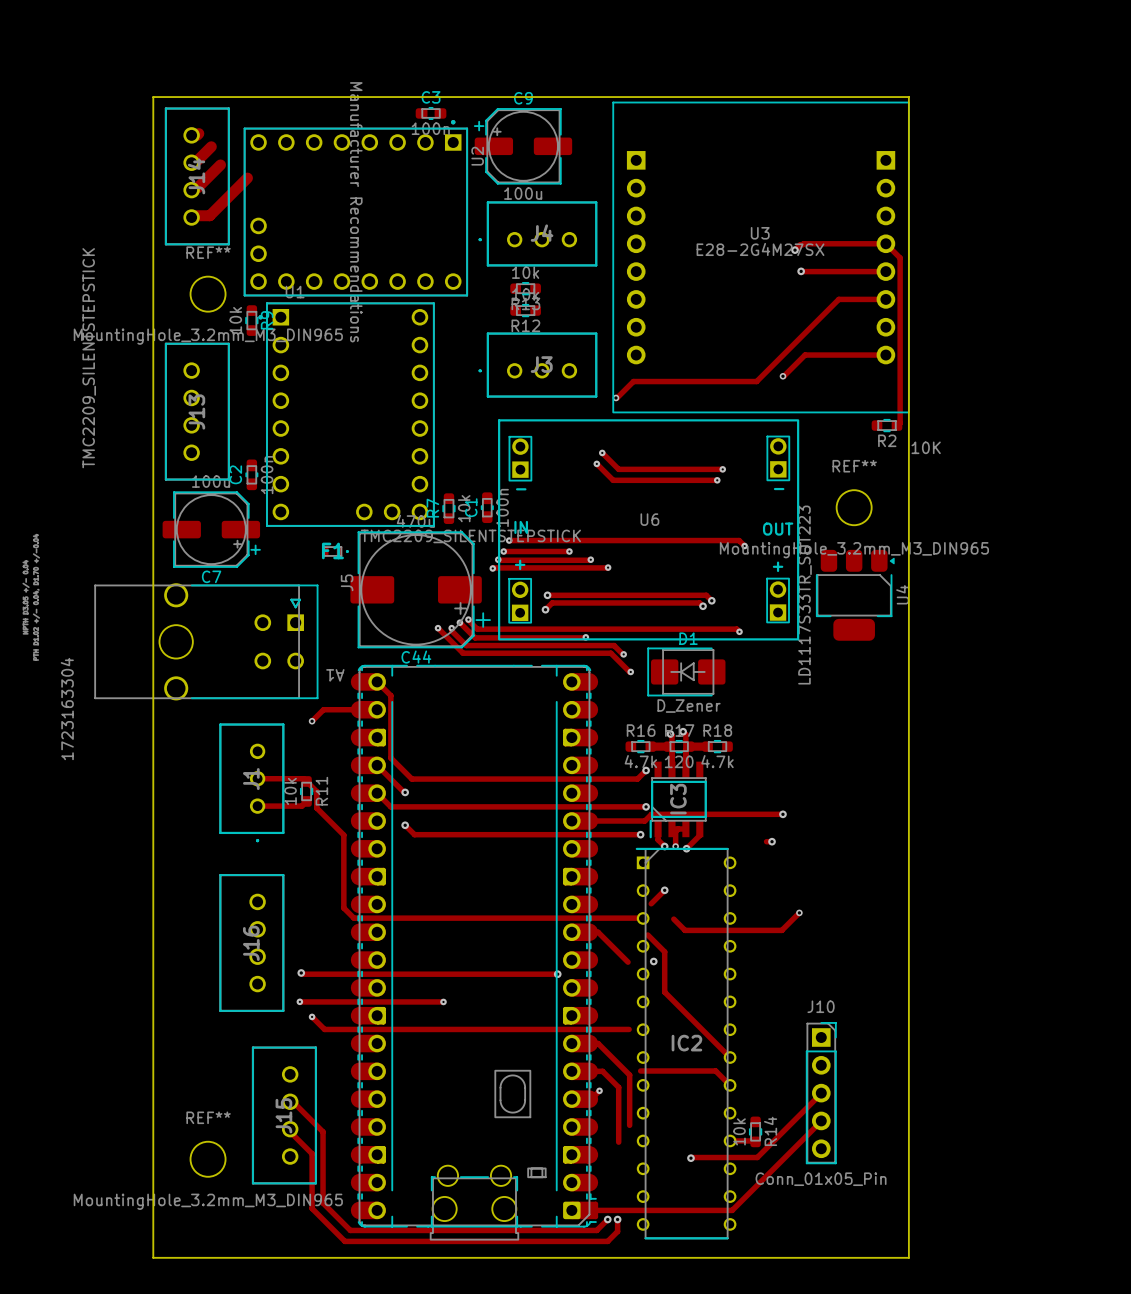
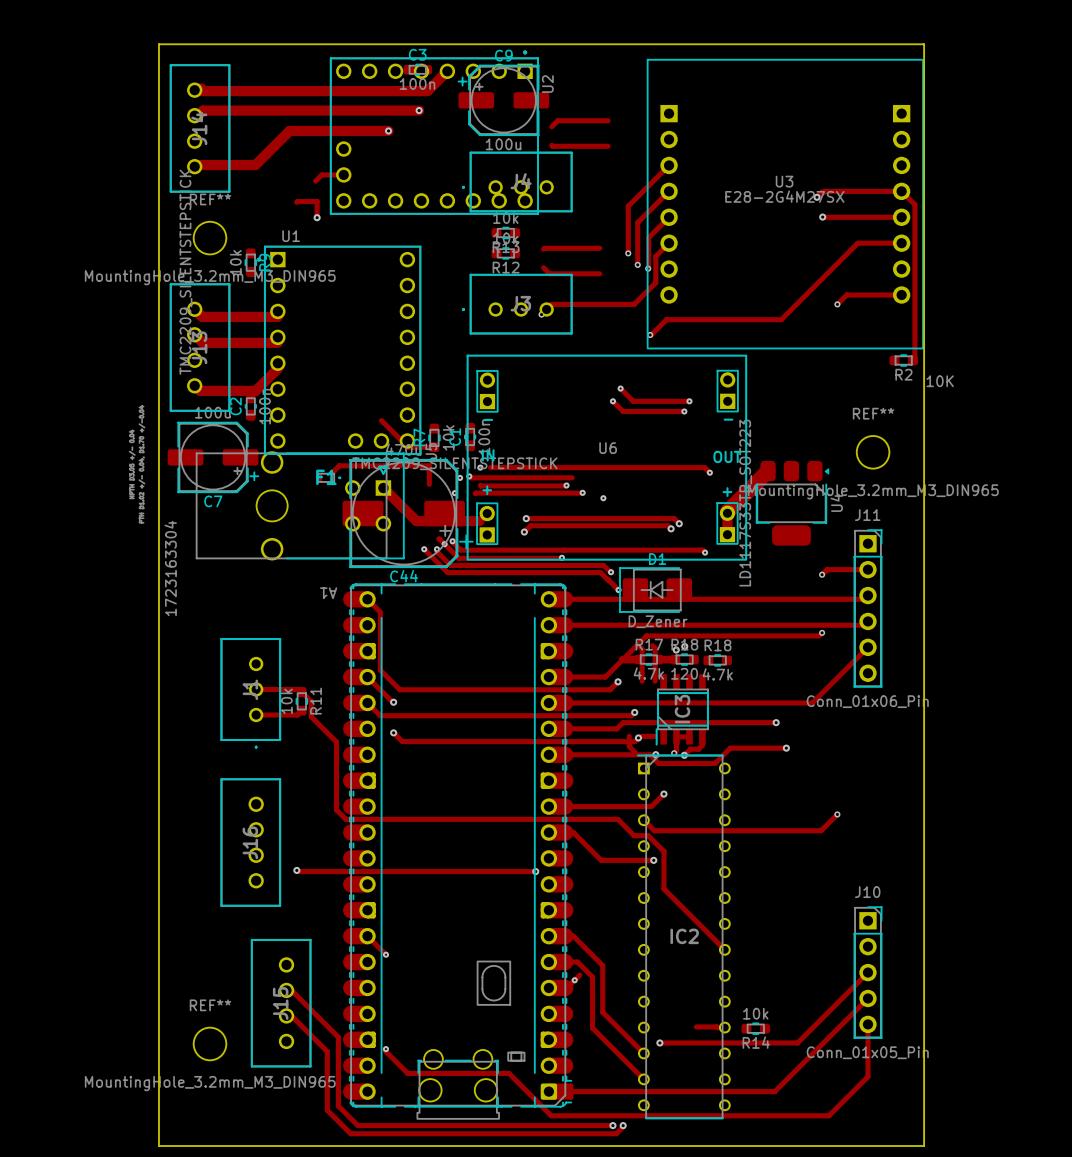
board edge: (153, 97) (908, 97) (908, 1257) (153, 1257) -> (159, 54) (159, 44) (924, 44) (924, 1146) (159, 1146) (159, 1135)
track: none -> (447, 71) (427, 91) (202, 91) (199, 88)
track: (211, 146) (200, 157) -> (419, 110) (203, 110)
via: none -> (419, 110)
track: (220, 164) (197, 188) -> none
track: none -> (608, 120) (557, 120) (551, 126)
track: (247, 178) (209, 215) -> (388, 130) (289, 130) (255, 165) (211, 165)
via: none -> (388, 130)
track: none -> (551, 145) (608, 146)
U2 position: (355, 208) -> (434, 132)
U2 text: Manufacturer Recommendations (356, 212) -> none
track: none -> (669, 165) (628, 206) (628, 253)
track: none -> (343, 174) (321, 174) (315, 181)
track: none -> (669, 191) (637, 222) (637, 264)
track: (795, 250) (803, 243) (885, 243) (900, 258) (900, 423) (898, 425) -> (816, 197) (824, 191) (901, 191) (914, 204) (914, 358) (913, 360)
via: (795, 250) -> none
via: none -> (816, 197)
track: none -> (296, 202) (317, 201) (317, 217)
U3 position: (761, 257) -> (785, 204)
track: none -> (669, 217) (648, 237) (648, 268)
via: (801, 271) -> none
via: none -> (822, 217)
track: (885, 271) (800, 272) -> (901, 217) (822, 217)
via: none -> (317, 217)
track: none -> (669, 243) (655, 256) (655, 282) (634, 304) (551, 304) (541, 314)
track: (885, 299) (838, 299) (756, 381) (633, 381) (615, 397) -> (901, 243) (857, 243) (781, 319) (666, 319) (650, 335)
track: none -> (599, 248) (543, 249)
via: none -> (628, 253)
via: none -> (637, 264)
track: none -> (543, 267) (549, 273) (599, 273)
via: none -> (648, 268)
track: (885, 355) (805, 355) (782, 376) -> none
track: none -> (901, 295) (846, 294) (837, 304)
via: none -> (837, 304)
track: none -> (199, 314) (202, 316) (277, 316)
via: none -> (541, 314)
via: (782, 376) -> none
via: (615, 397) -> none
via: none -> (650, 335)
track: none -> (199, 339) (202, 342) (277, 342)
R2 position: (887, 425) -> (903, 360)
track: none -> (277, 368) (255, 390) (199, 390)
track: (602, 452) (618, 469) (662, 469) -> (620, 388) (633, 401)
via: (602, 452) -> none
via: none -> (620, 388)
track: (596, 463) (613, 480) (651, 480) -> (612, 401) (623, 411)
via: (596, 463) -> none
via: none -> (612, 401)
track: none -> (381, 420) (408, 447) (429, 447)
REF** position: (854, 507) -> (873, 452)
U6 position: (648, 529) -> (606, 457)
via: none -> (480, 467)
via: (509, 540) -> none
track: none -> (768, 471) (727, 511) (727, 534)
track: none -> (332, 472) (339, 465) (429, 465) (429, 484)
track: none -> (469, 476) (485, 477)
via: none -> (469, 476)
via: none -> (460, 477)
via: (503, 551) -> none
track: none -> (546, 477) (572, 477)
via: (569, 551) -> none
via: (498, 559) -> none
track: none -> (383, 488) (416, 521) (479, 521)
via: none -> (454, 493)
via: (492, 568) -> none
via: none -> (603, 498)
U4 position: (855, 595) -> (792, 503)
track: none -> (438, 539) (444, 544)
J5 position: (206, 641) -> (300, 505)
track: (614, 645) (623, 654) -> (588, 565) (603, 565) (611, 572)
track: none -> (867, 569) (827, 569) (822, 574)
via: none -> (611, 572)
track: (610, 653) (630, 671) -> (585, 572) (600, 572) (618, 590)
via: (623, 654) -> none
via: none -> (822, 574)
via: (630, 671) -> none
via: none -> (618, 590)
track: none -> (867, 595) (864, 599) (557, 599)
J11: none -> Conn_01x06_Pin (867, 608)
track: none -> (867, 621) (864, 625) (557, 625)
track: (377, 709) (323, 709) (312, 721) -> none
track: none -> (822, 632) (819, 635) (646, 635) (605, 677) (557, 677)
via: none -> (822, 632)
via: (312, 721) -> none
via: (683, 731) -> none
via: none -> (684, 646)
via: (670, 733) -> none
track: none -> (867, 647) (812, 702) (548, 702)
via: none -> (676, 650)
R16: 4.7k (640, 746) -> none
R18: none -> 4.7k (717, 660)
R17 value: 120 (679, 761) -> 4.7k (648, 673)
R18 value: 4.7k (717, 761) -> 120 (684, 673)
IC3 position: (678, 799) -> (682, 709)
track: none -> (634, 712) (631, 715) (618, 715)
via: none -> (634, 712)
via: (646, 806) -> none
track: none -> (745, 722) (776, 722)
via: (782, 814) -> none
via: none -> (776, 722)
track: (678, 828) (675, 831) (675, 846) -> none
track: (699, 828) (699, 835) (686, 848) -> none
track: none -> (689, 736) (676, 736) (676, 750) (674, 753)
track: none -> (702, 736) (702, 745) (698, 749) (690, 749) (684, 755)
track: none -> (638, 737) (634, 741) (612, 741)
via: none -> (638, 737)
via: (640, 834) -> none
track: none -> (730, 748) (715, 763) (658, 763) (650, 754) (548, 754)
track: none -> (735, 748) (786, 748)
via: (772, 841) -> none
via: none -> (786, 748)
via: (664, 846) -> none
via position: (675, 846) -> (674, 753)
via: none -> (684, 755)
track: (664, 890) (651, 903) -> none
via: (664, 890) -> none
track: none -> (663, 794) (651, 806) (557, 806)
via: none -> (663, 794)
track: (799, 912) (781, 930) -> (837, 814) (821, 830) (744, 830)
via: (799, 912) -> none
via: none -> (837, 814)
track: none -> (617, 819) (634, 835) (648, 835) (663, 851) (663, 888) (724, 949)
track: (647, 934) (664, 951) (664, 992) (730, 1057) -> none
via position: (653, 961) -> (653, 860)
track: none -> (601, 860) (653, 860)
track: (299, 1001) (443, 1001) -> none
via: (299, 1001) -> none
via: (443, 1001) -> none
track: (312, 1016) (324, 1029) (629, 1029) -> none
via: (312, 1016) -> none
track: none -> (367, 936) (385, 954)
IC2 position: (686, 1043) -> (683, 936)
via: none -> (385, 954)
track: (640, 1071) (715, 1071) (730, 1085) -> none
track: none -> (579, 975) (574, 980)
track: (821, 1087) (821, 1093) (757, 1157) (690, 1158) -> (867, 972) (797, 1042) (659, 1042)
J10 position: (821, 1093) -> (867, 972)
track: (295, 1101) (295, 1104) (323, 1131) (323, 1203) (345, 1225) -> (291, 990) (338, 1037) (338, 1106)
track: (821, 1115) (821, 1121) (732, 1210) -> (867, 998) (774, 1091) (698, 1091)
track: none -> (602, 1012) (643, 1053)
R14 rotation: 0° (755, 1131) -> 90° clockwise (755, 1028)
R14 position: (755, 1131) -> (755, 1028)
track: (291, 1133) (312, 1153) (312, 1208) (333, 1230) -> (291, 1015) (327, 1051) (327, 1110)
track: none -> (867, 1024) (867, 1076) (828, 1115) (551, 1115) (509, 1073) (407, 1073) (385, 1051) (385, 1049)
track: none -> (592, 1028) (643, 1079)
via: none -> (385, 1049)
track: (607, 1219) (596, 1230) (350, 1230) -> (612, 1125) (357, 1125) (342, 1110)
via: (607, 1219) -> none
track: (617, 1219) (617, 1231) (607, 1241) (344, 1241) -> (623, 1125) (616, 1133) (350, 1133) (337, 1120)
via: (617, 1219) -> none
via: none -> (612, 1125)
via: none -> (623, 1125)

